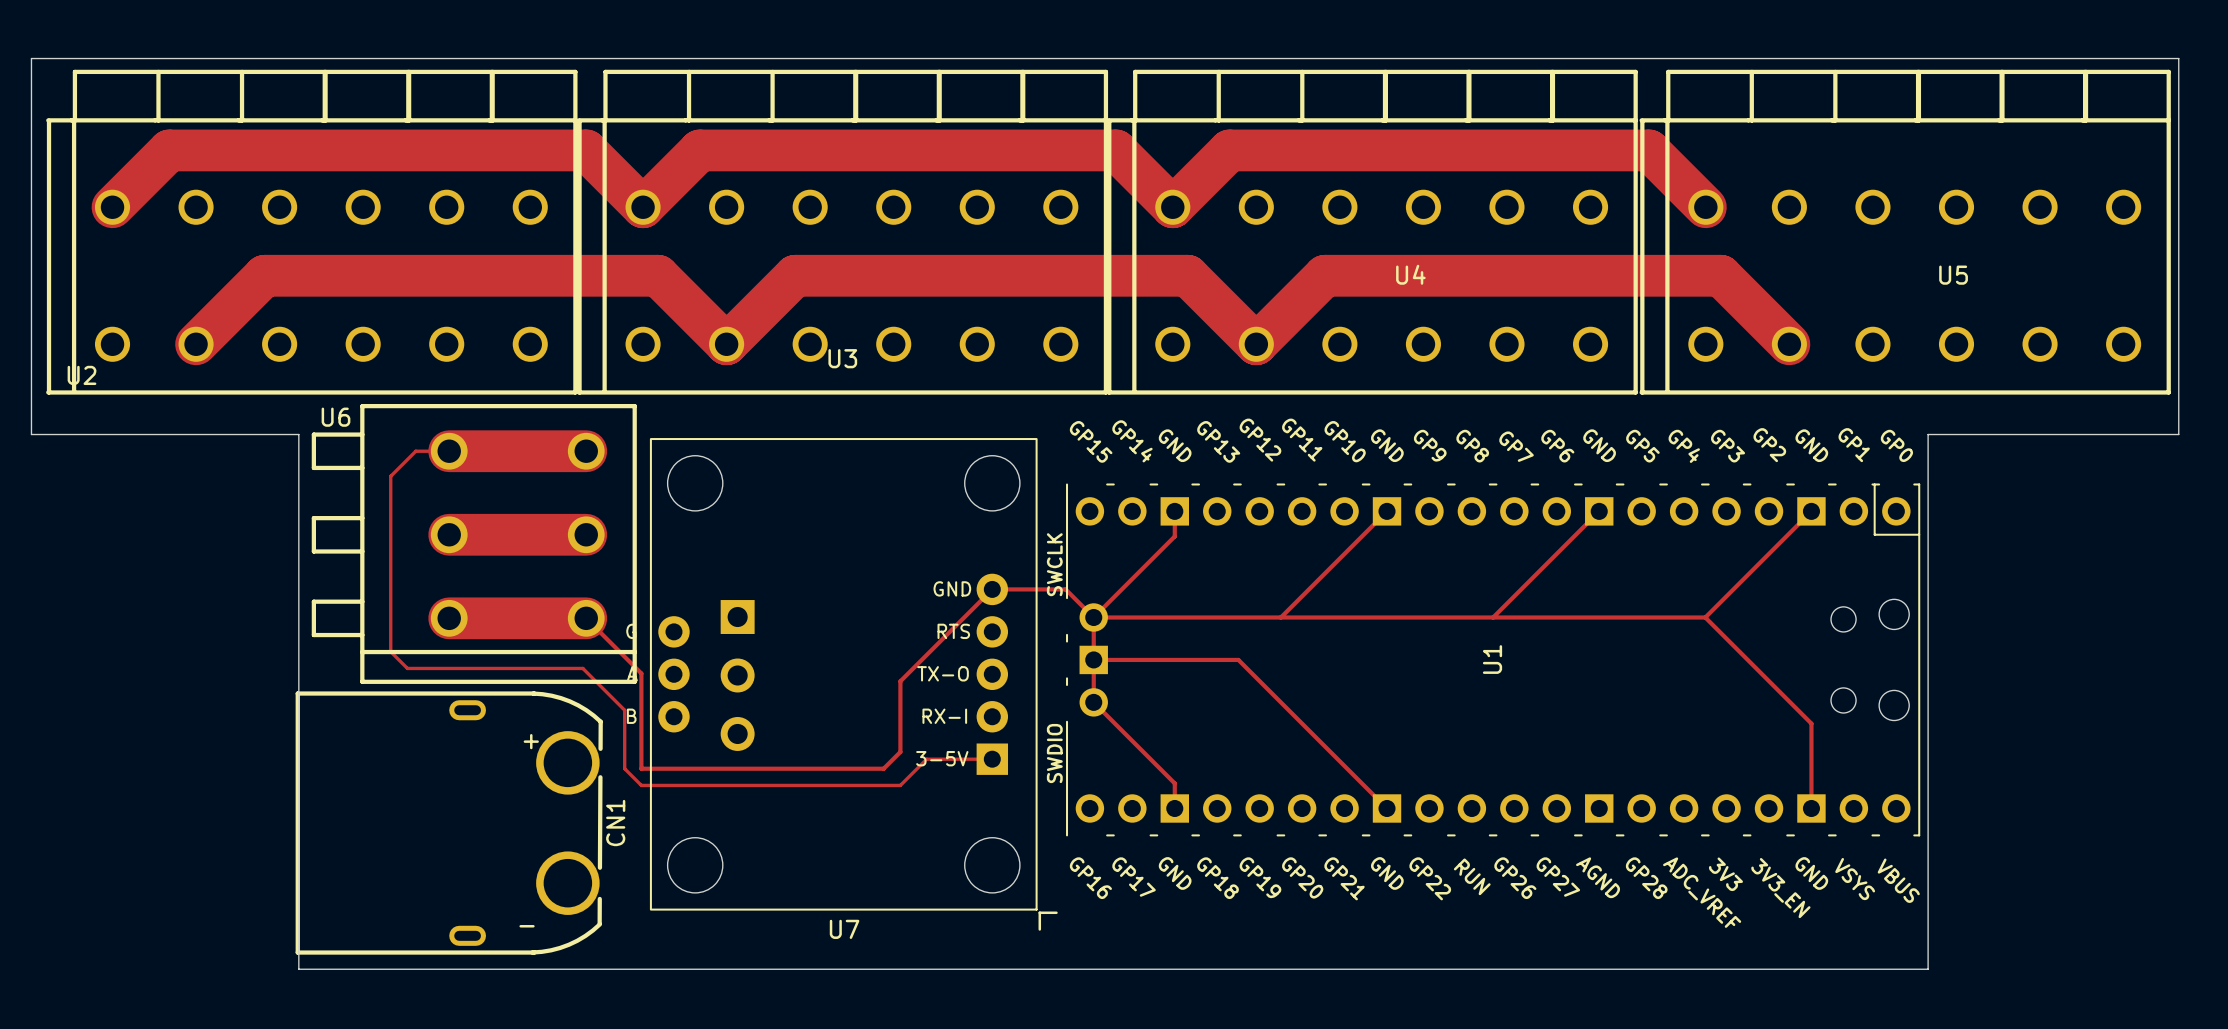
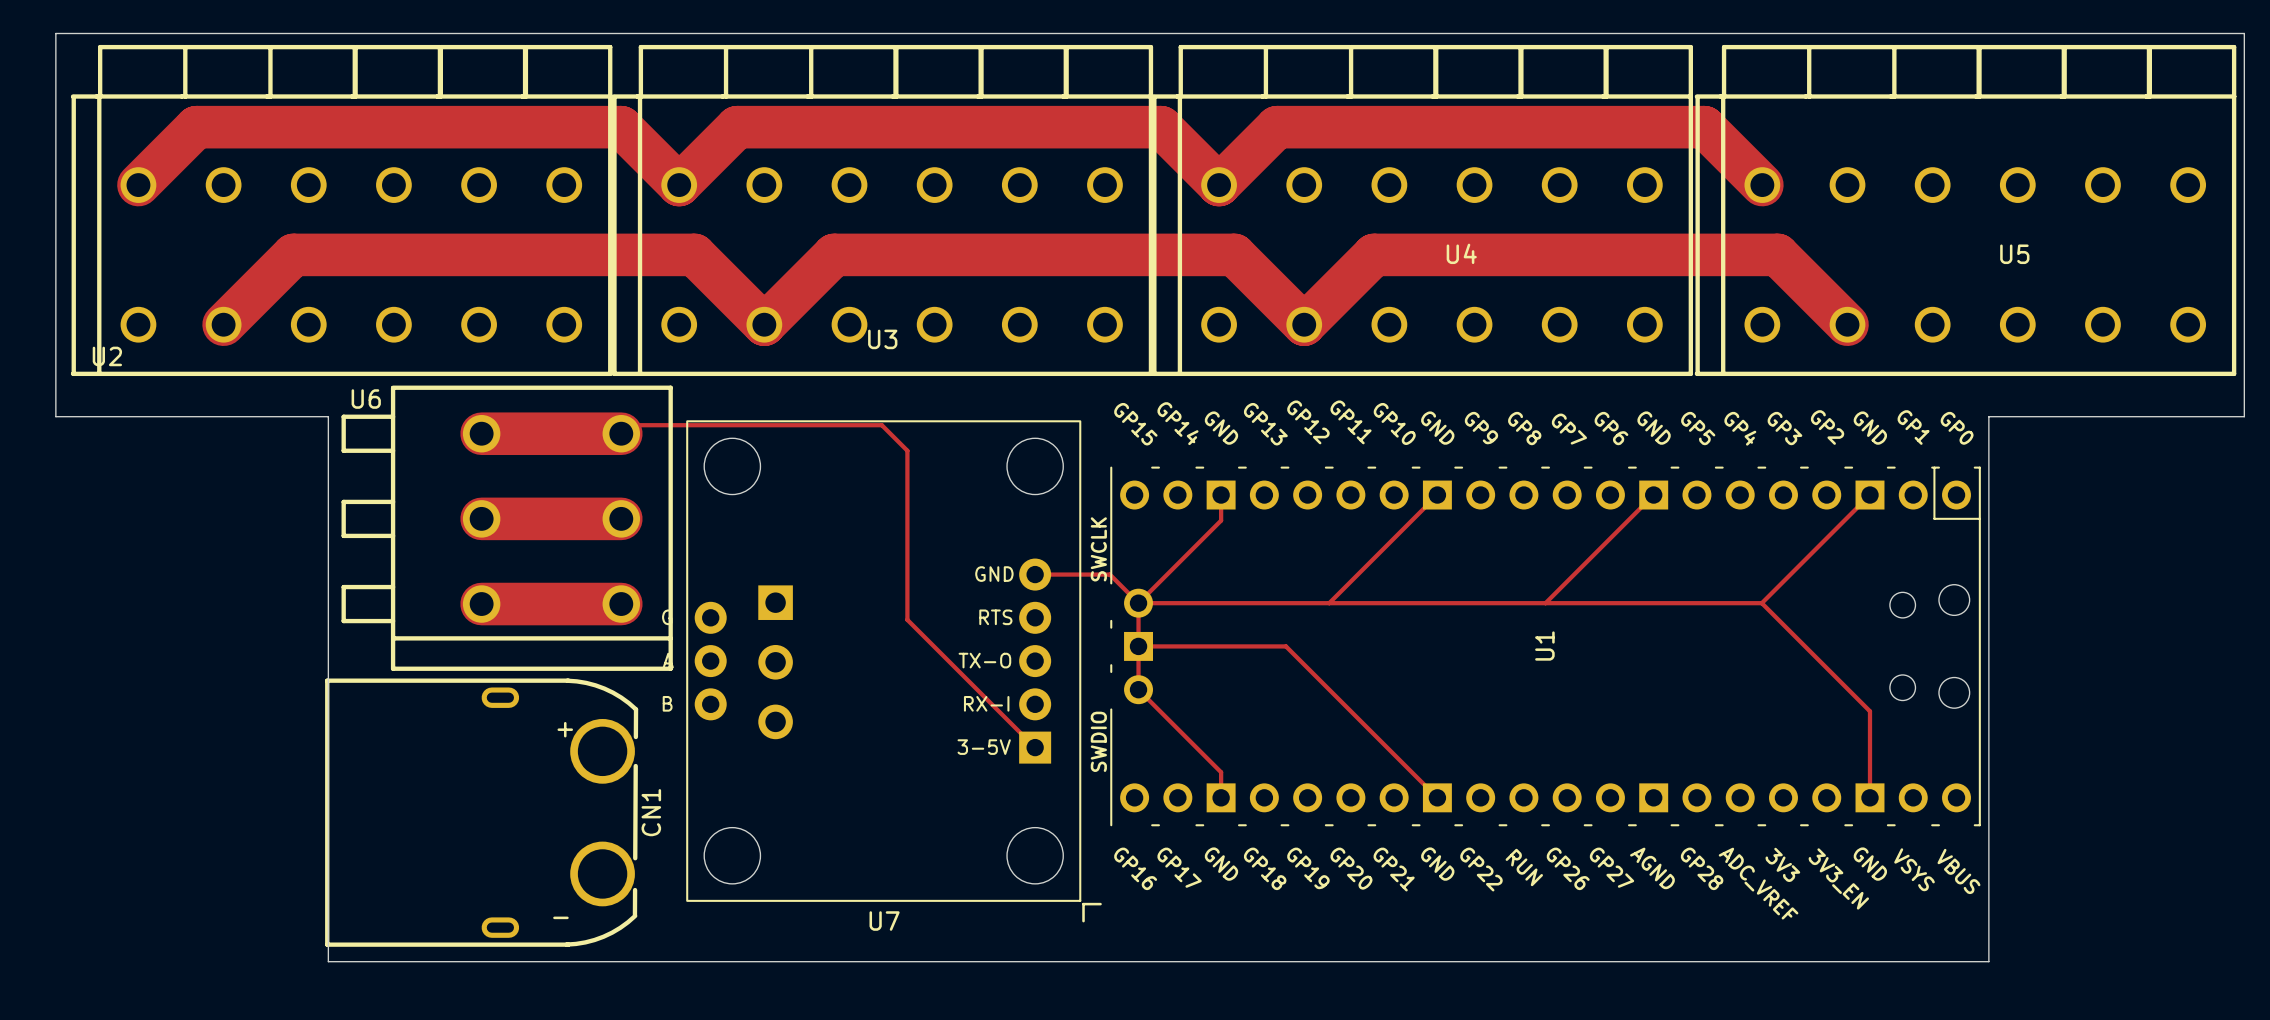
track: (449, 451) (415, 451) (390, 476) (390, 651) (407, 668) (582, 668) (624, 710) (624, 768) (641, 785) (900, 785) (926, 759) (992, 759) -> (621, 433) (629, 425) (881, 425) (907, 450) (907, 619) (1035, 747)
track: (992, 589) (900, 681) (900, 752) (883, 768) (641, 768) (641, 673) (586, 618) -> none

